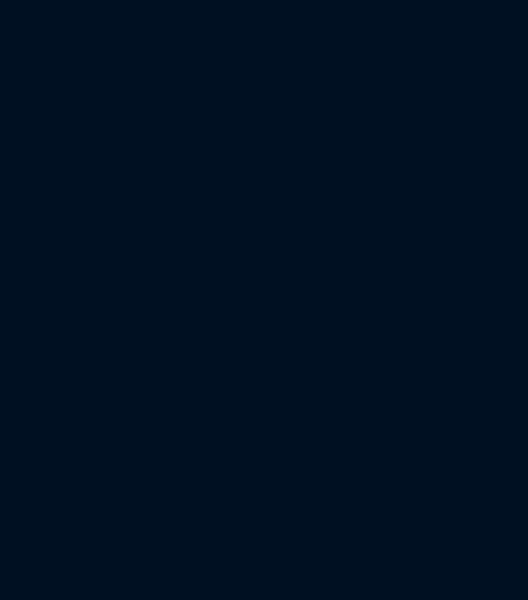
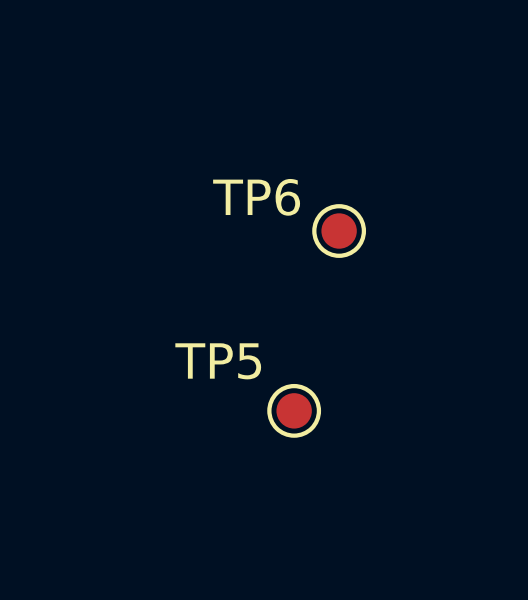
TP6: none -> (339, 231)
TP5: none -> (294, 410)

